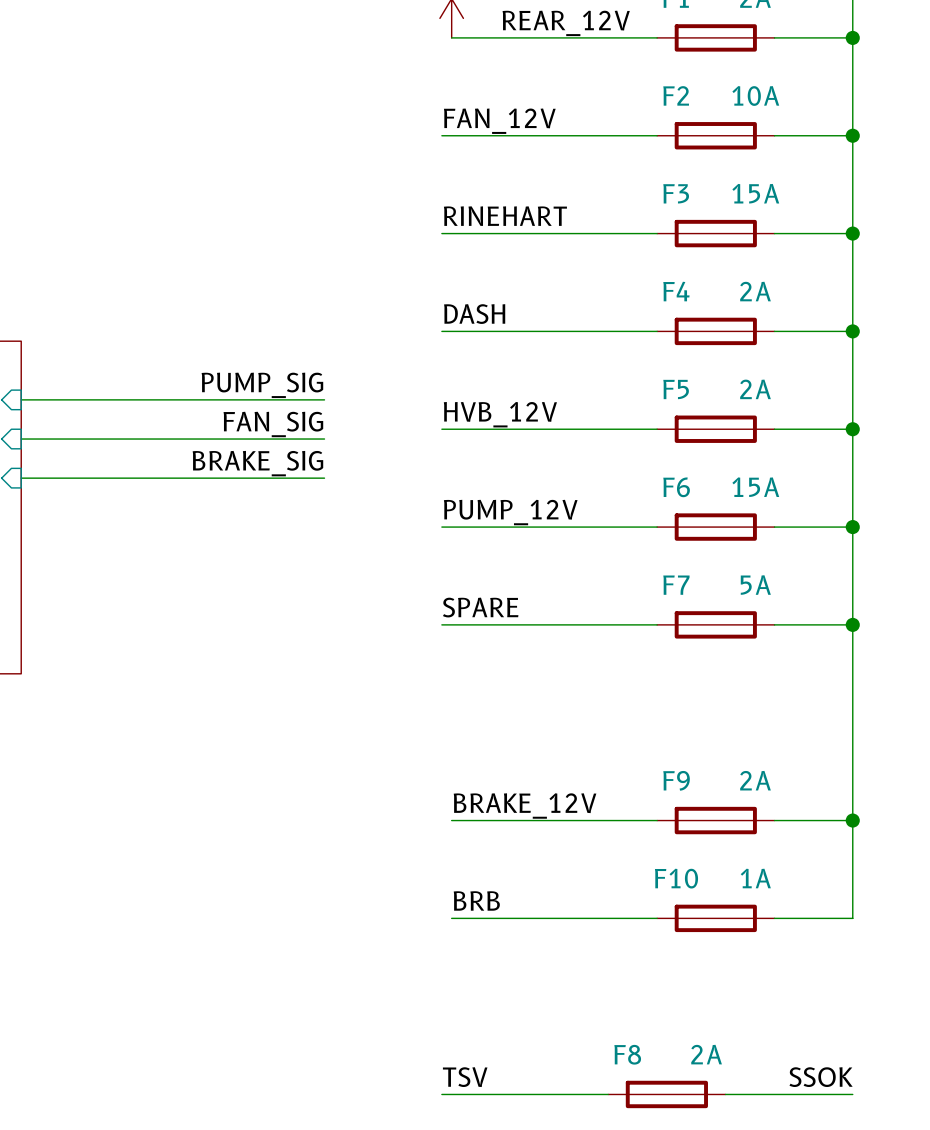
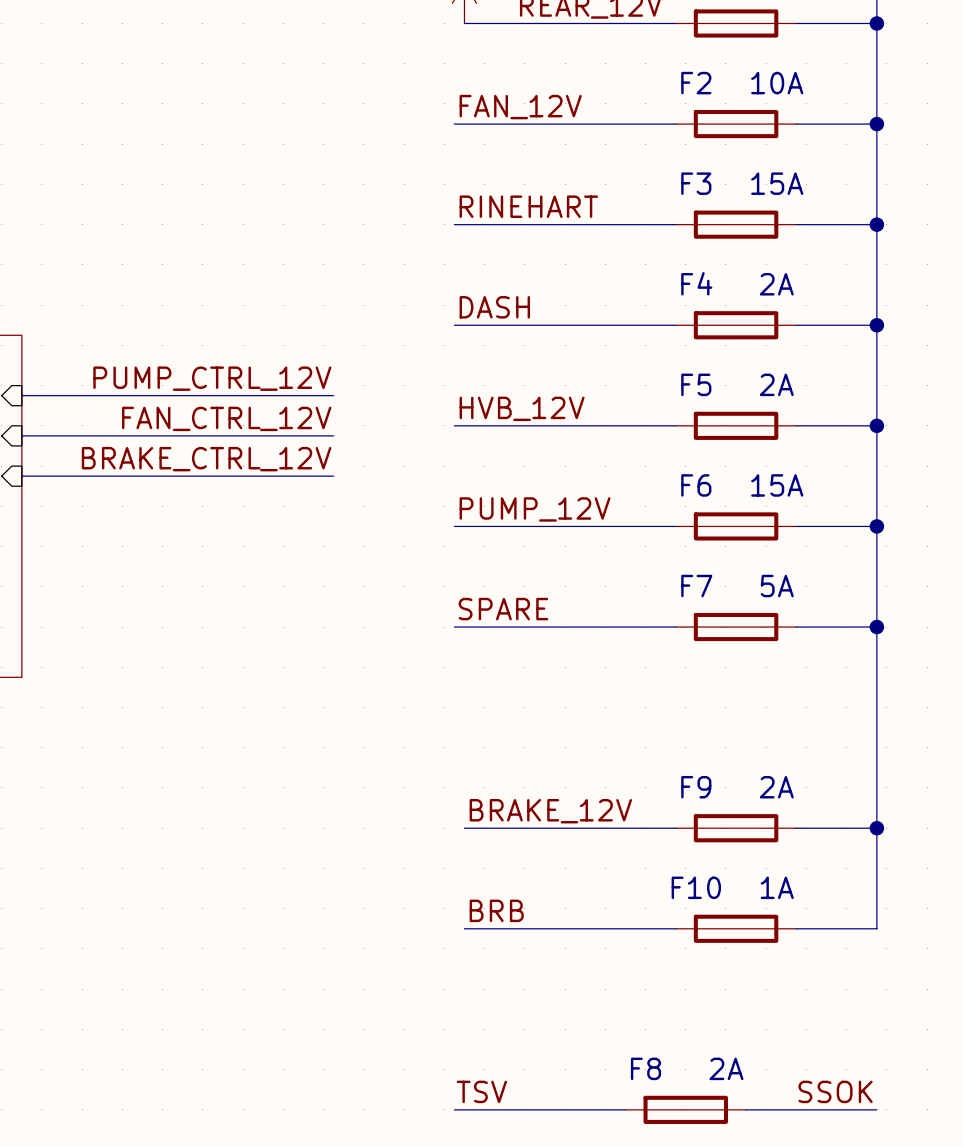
label: PUMP_SIG (262, 385) -> PUMP_CTRL_12V (212, 378)
label: FAN_SIG (273, 424) -> FAN_CTRL_12V (226, 418)
label: BRAKE_SIG (257, 463) -> BRAKE_CTRL_12V (206, 459)

